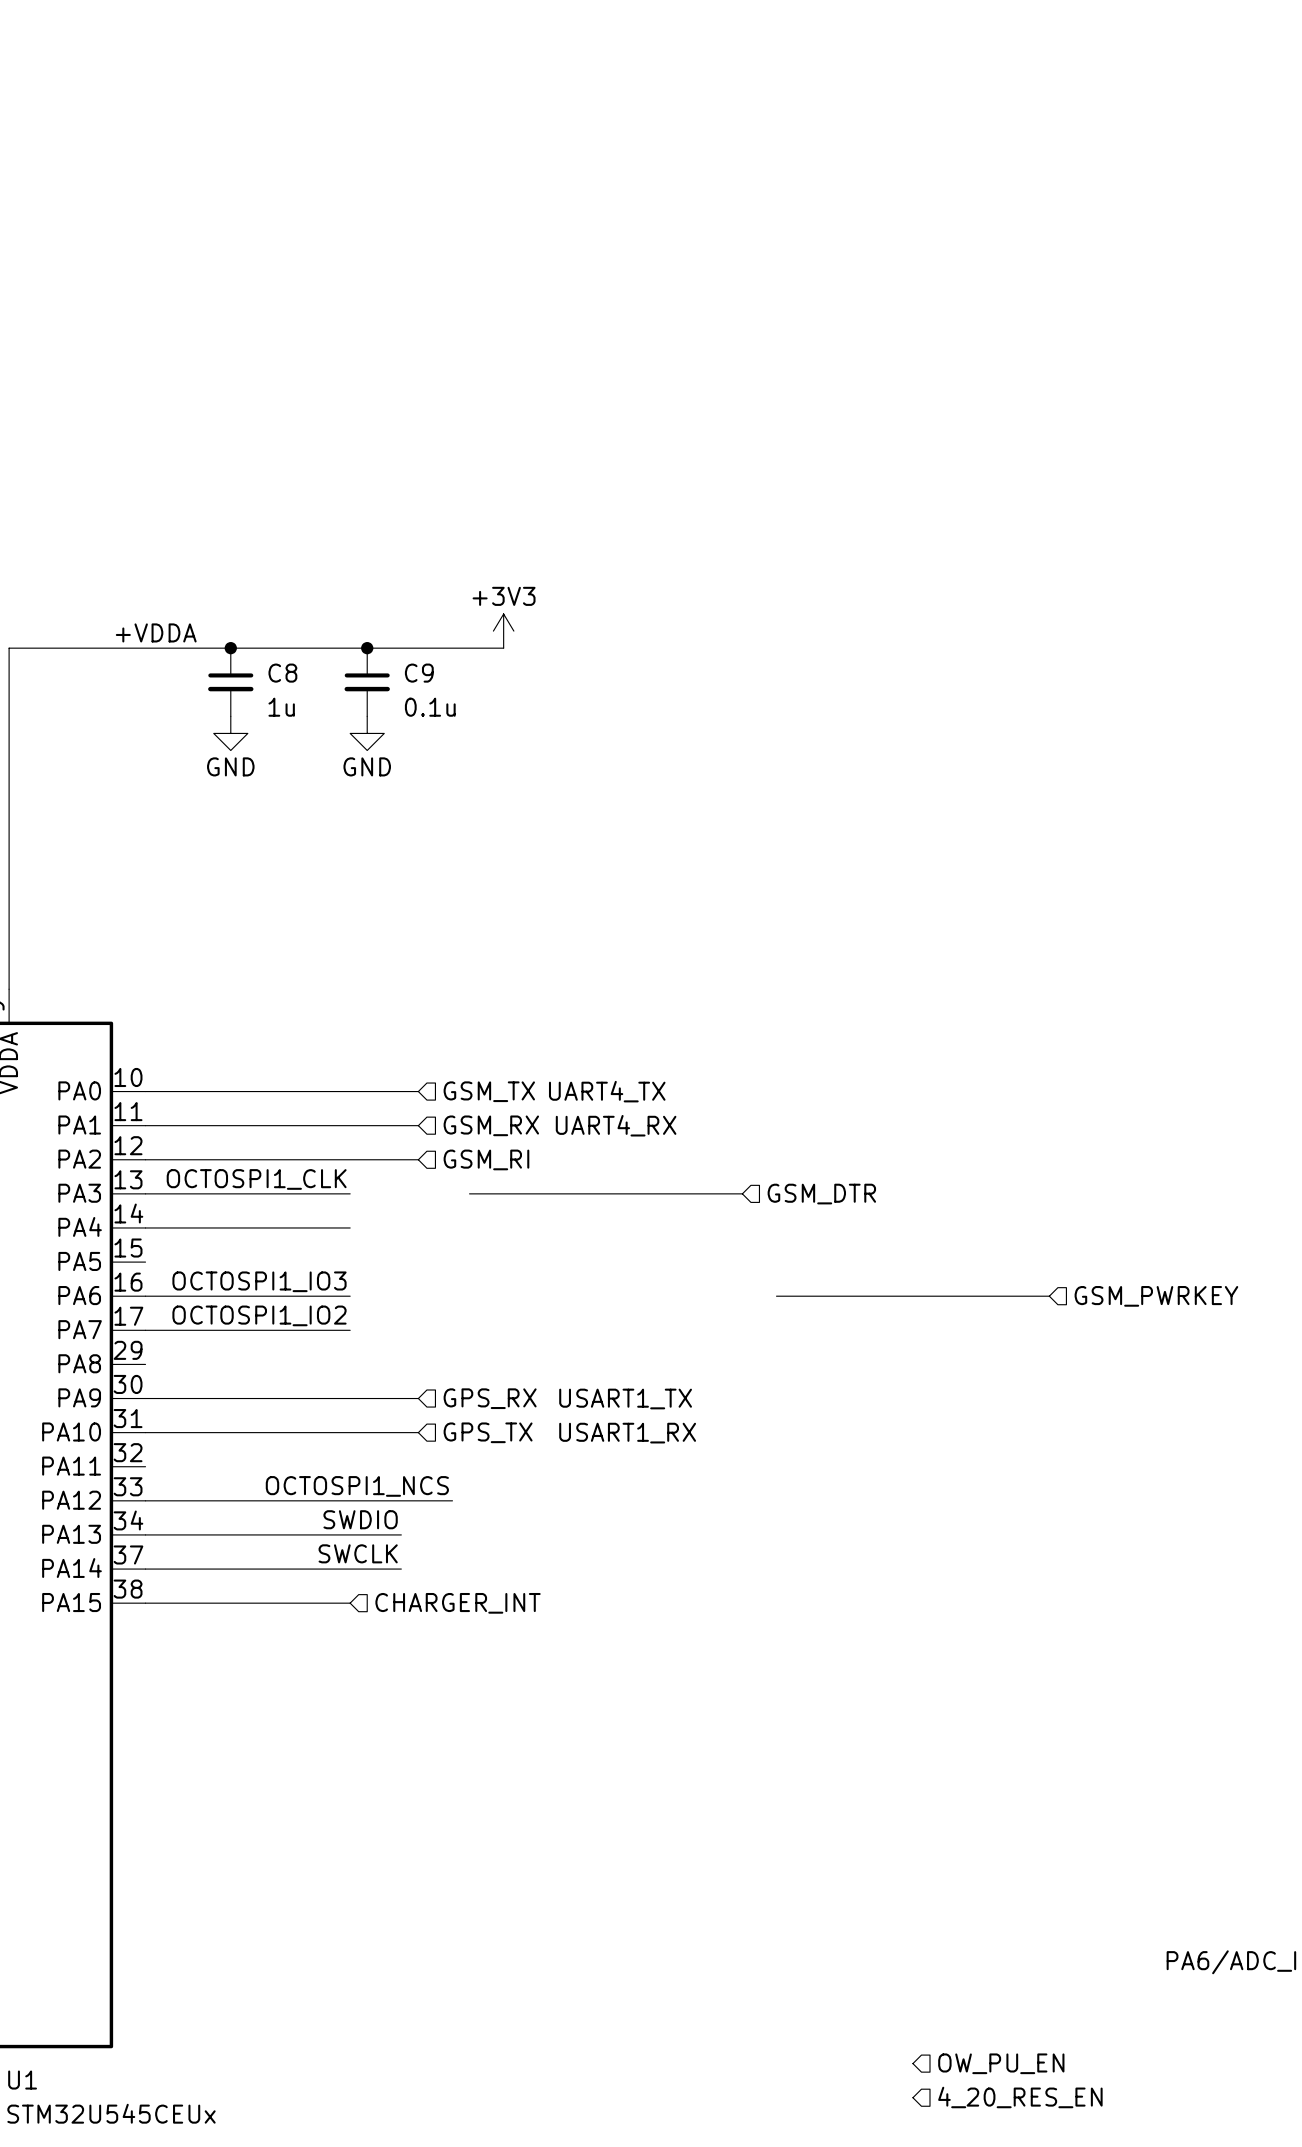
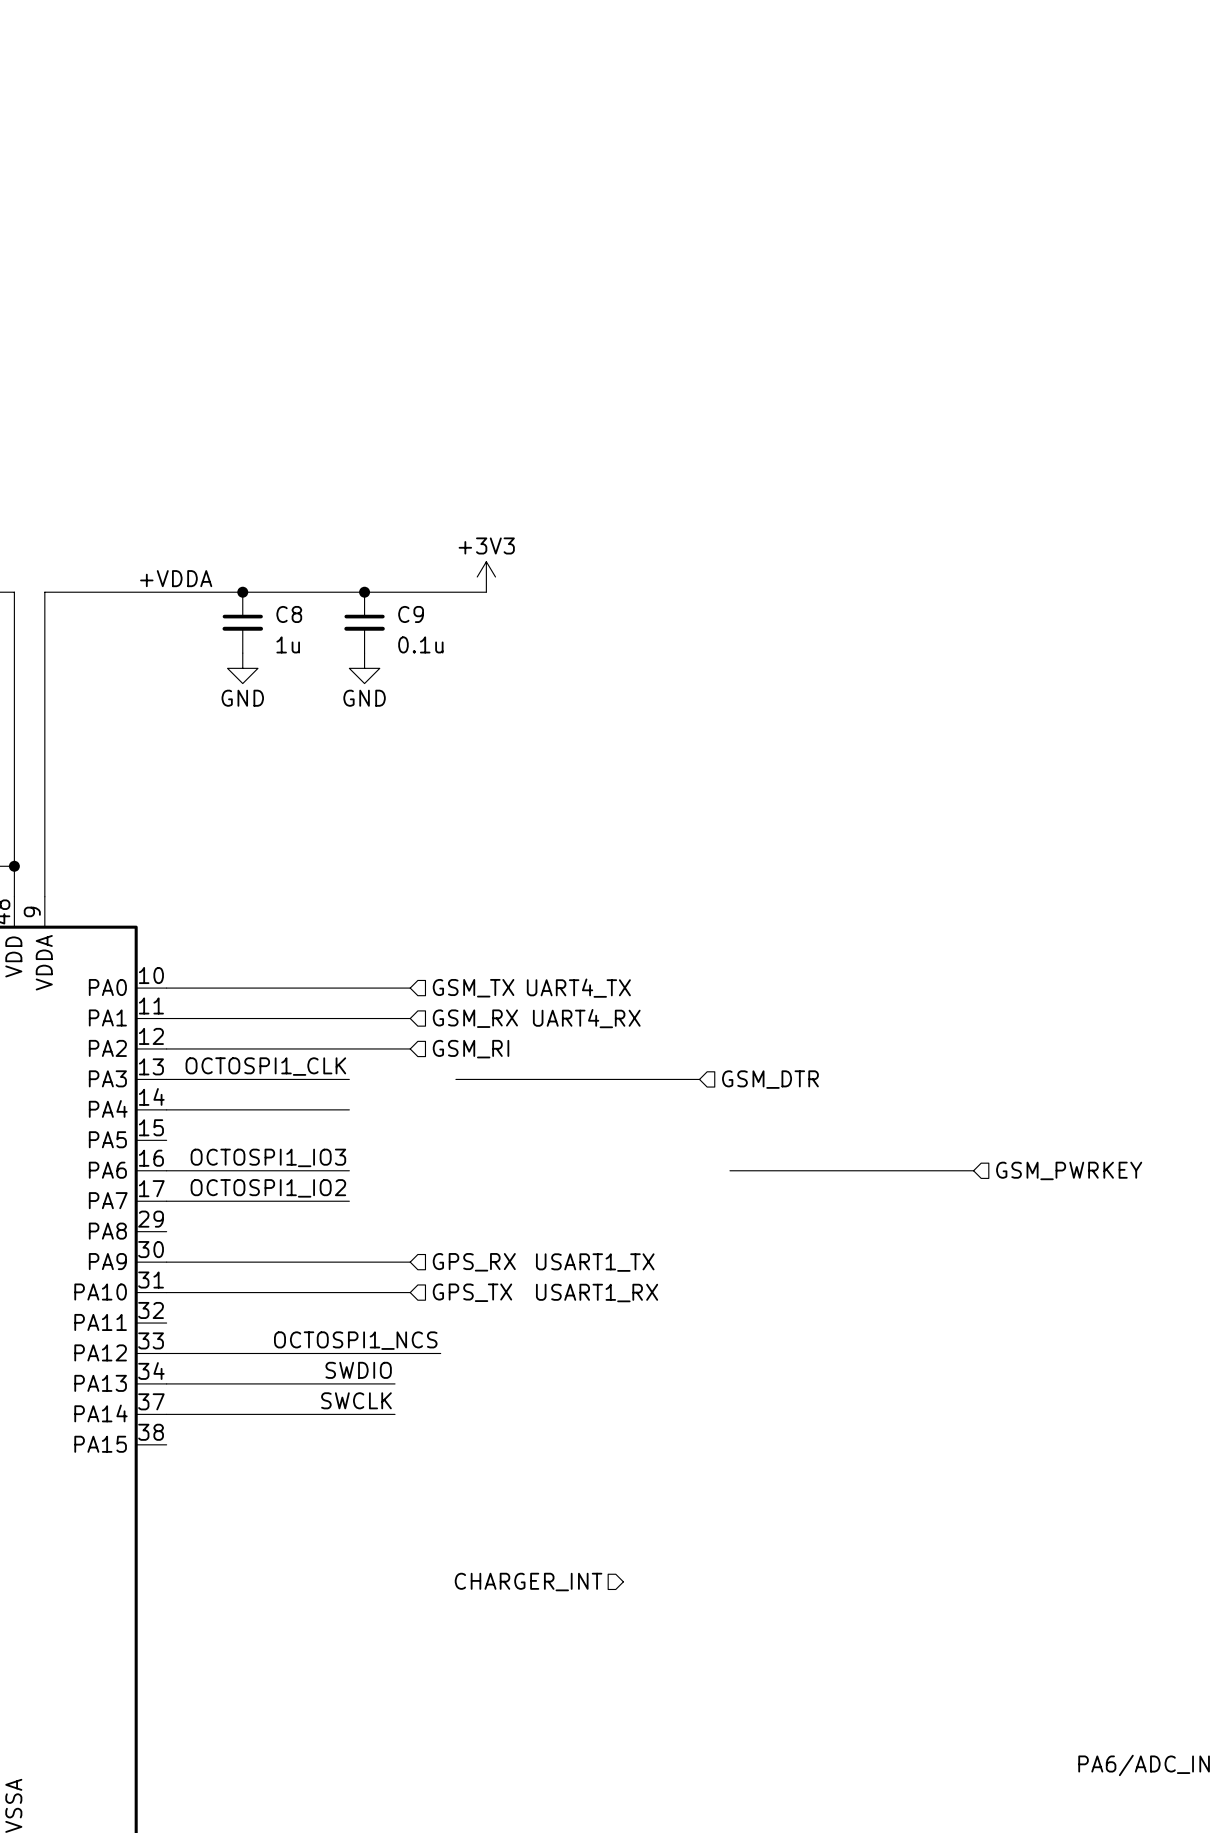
wire: (145, 1603) (350, 1603) -> none
hierarchical label rotation: 0° (458, 1603) -> 180° (528, 1582)

